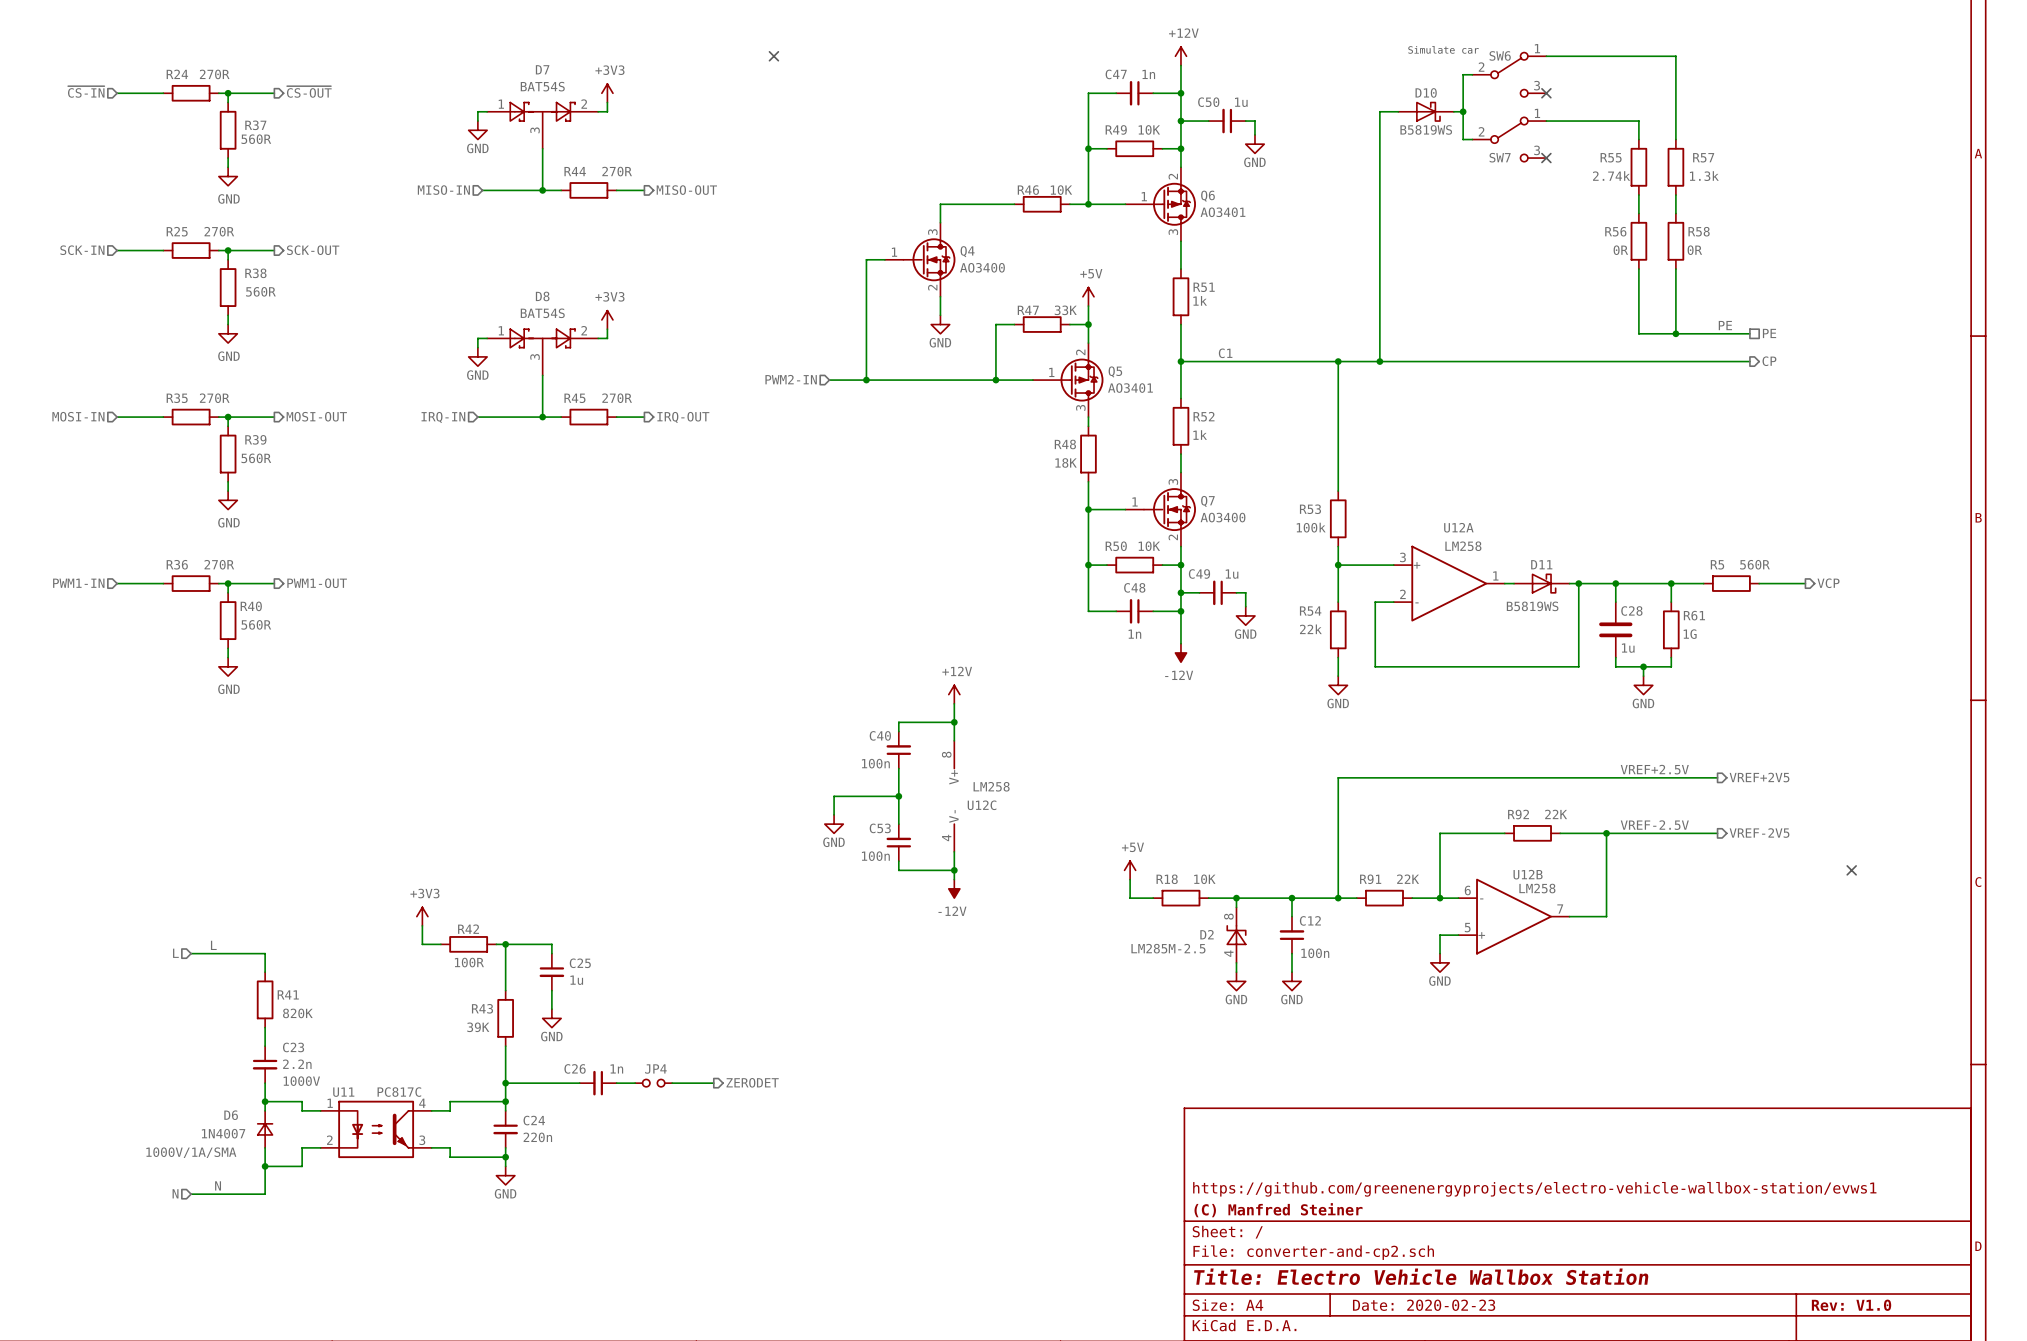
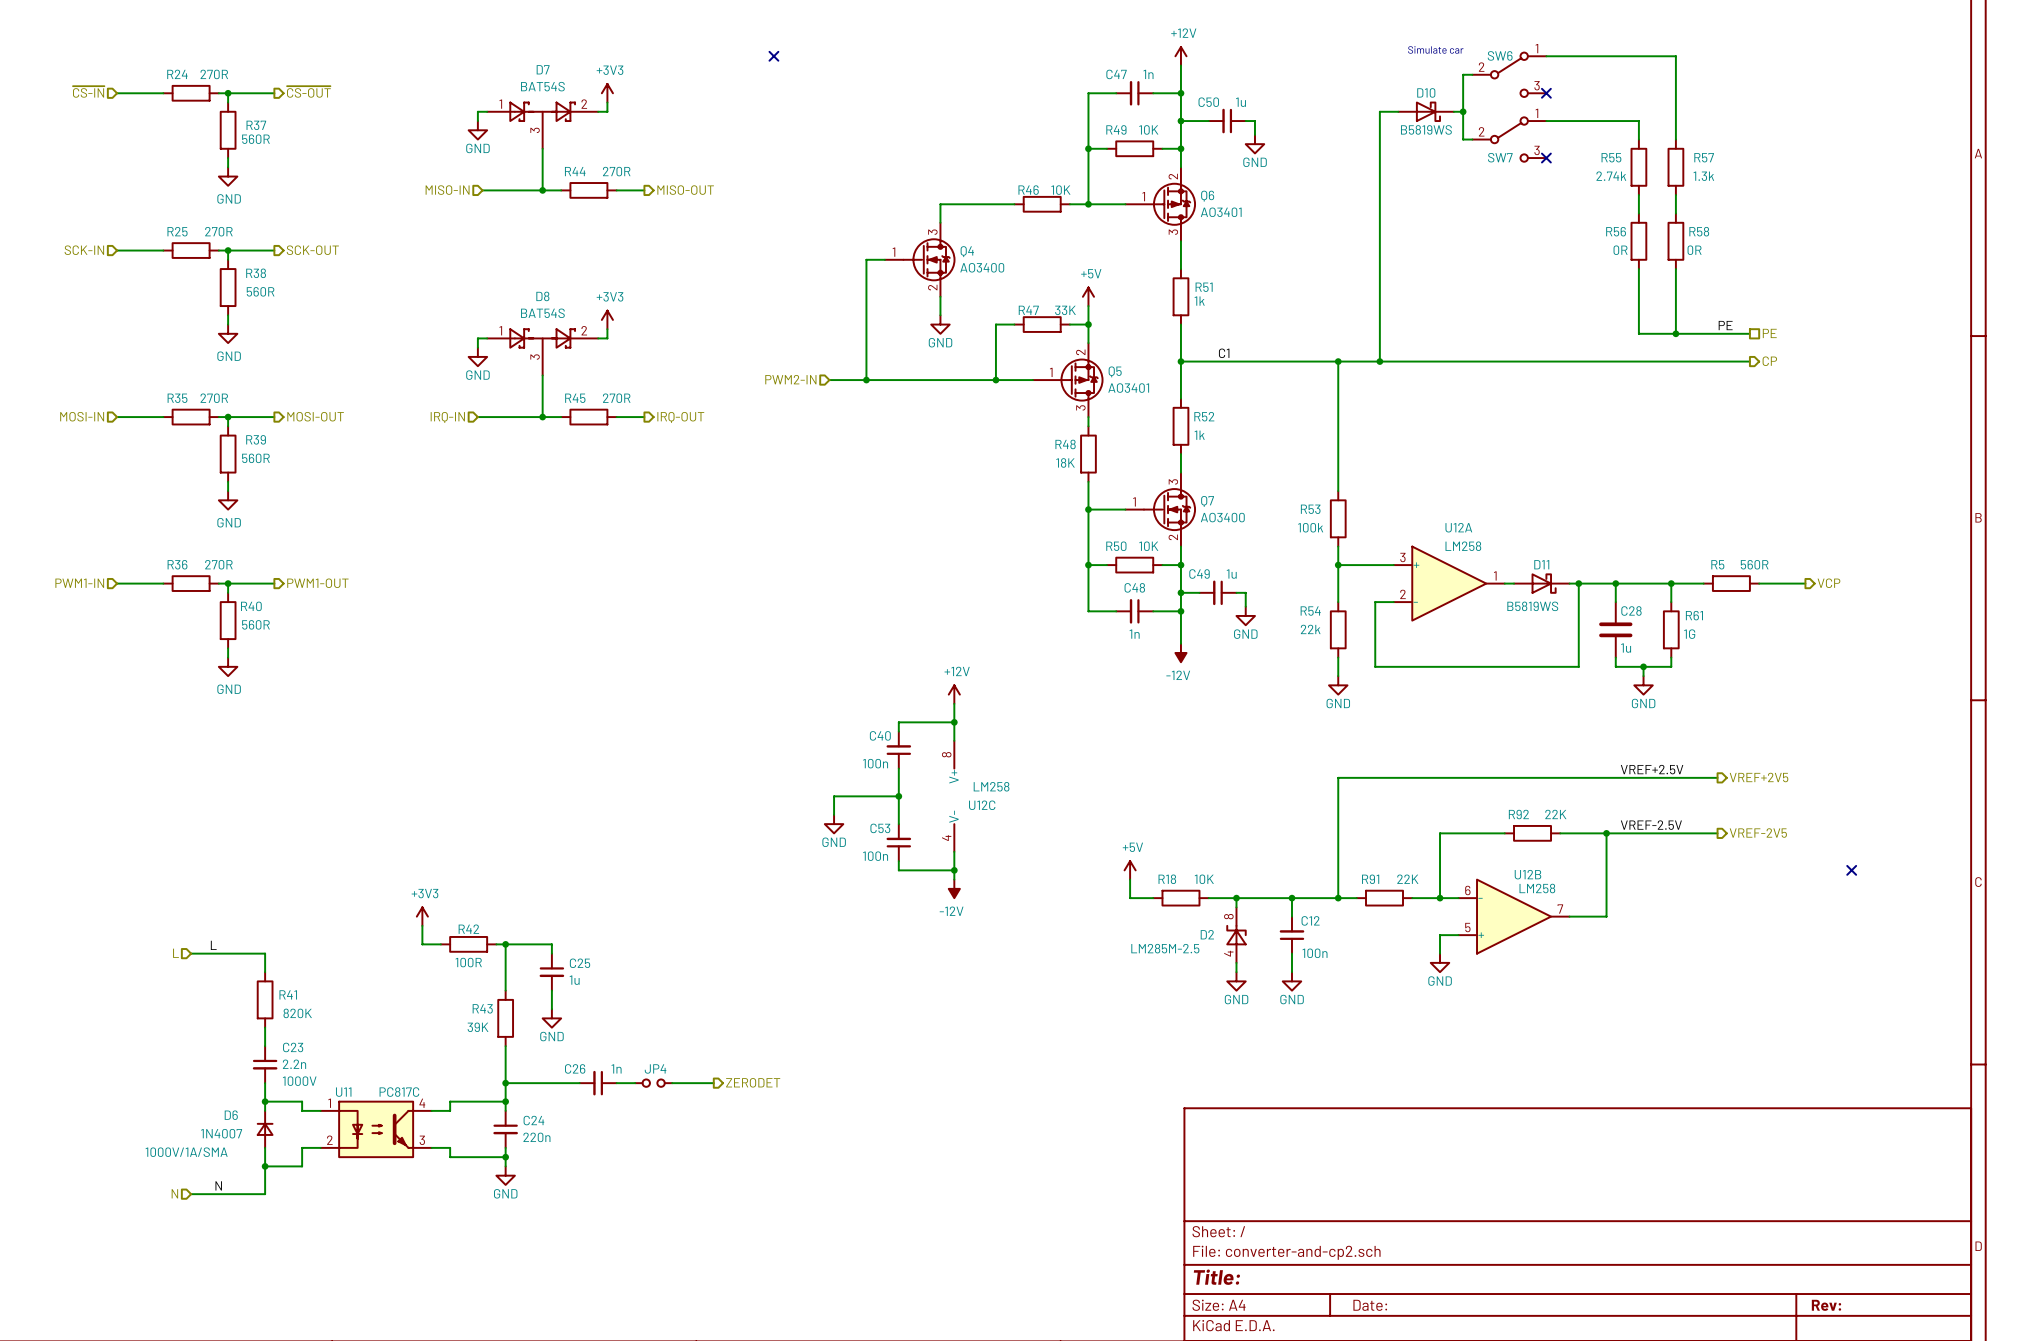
title block: https://github.com/greenenergyprojects/electro-vehicle-wallbox-station/evws1 (1534, 1189) -> none
title block: (C) Manfred Steiner (1278, 1210) -> none
title block: Title: Electro Vehicle Wallbox Station (1421, 1276) -> Title: (1216, 1277)
title block: Date: 2020-02-23 (1424, 1305) -> Date: (1370, 1305)
title block: Rev: V1.0 (1851, 1305) -> Rev: (1826, 1305)

